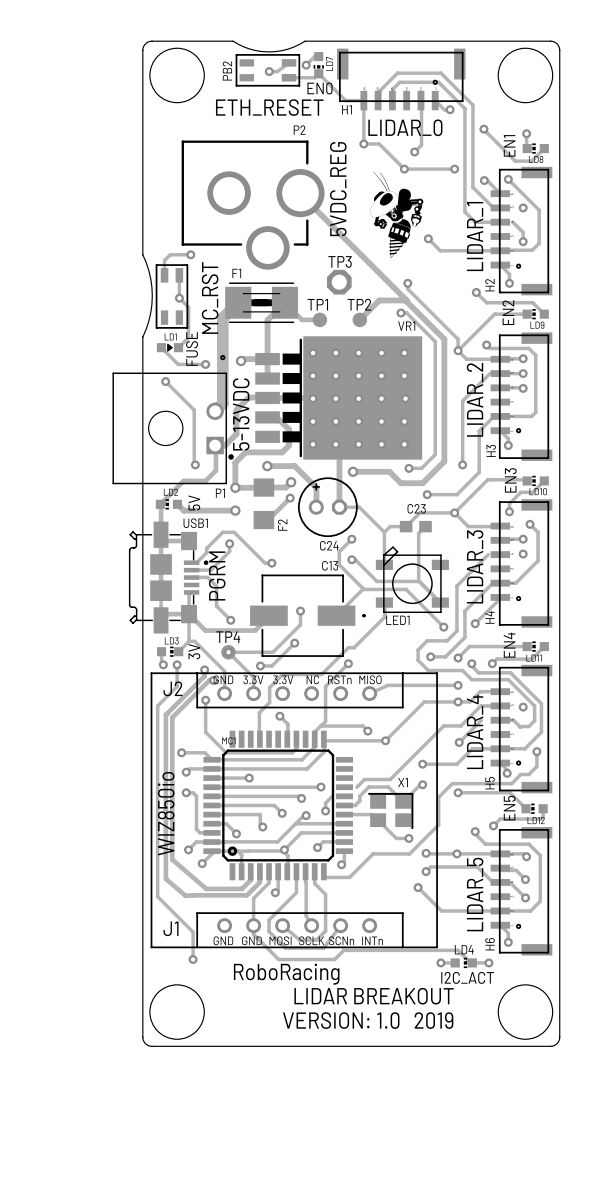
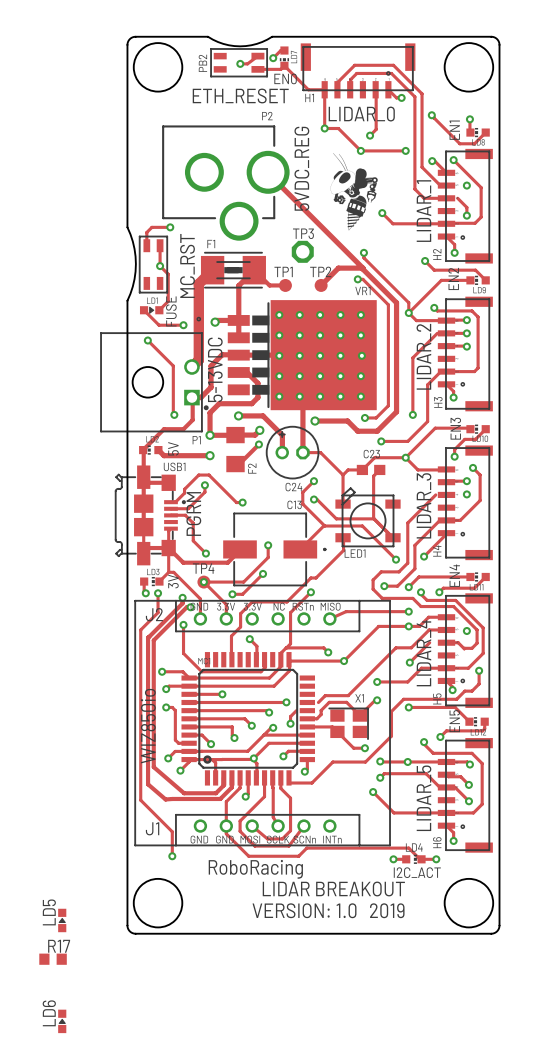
LD5: none -> (62, 920)
R17: none -> (53, 959)
LD6: none -> (62, 1021)

